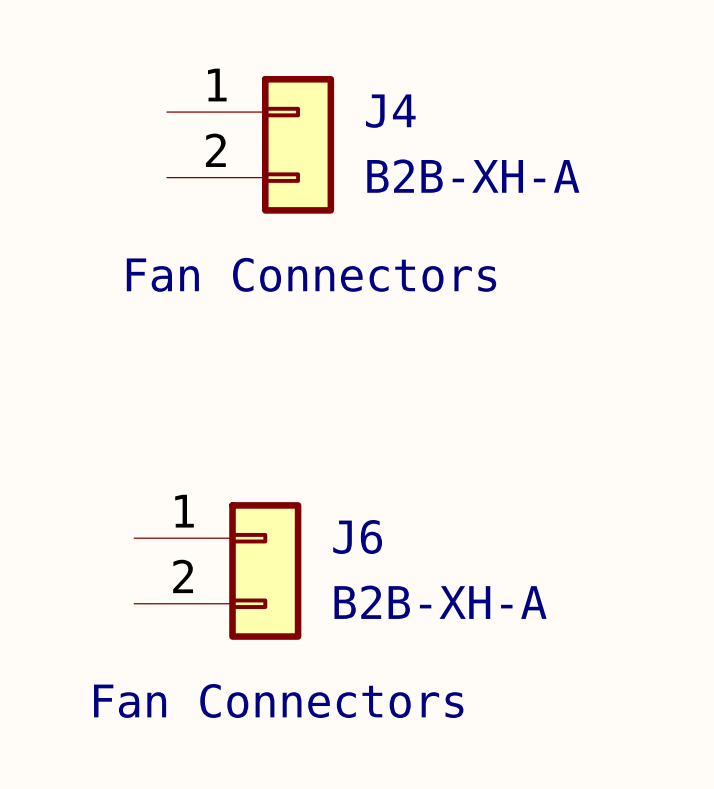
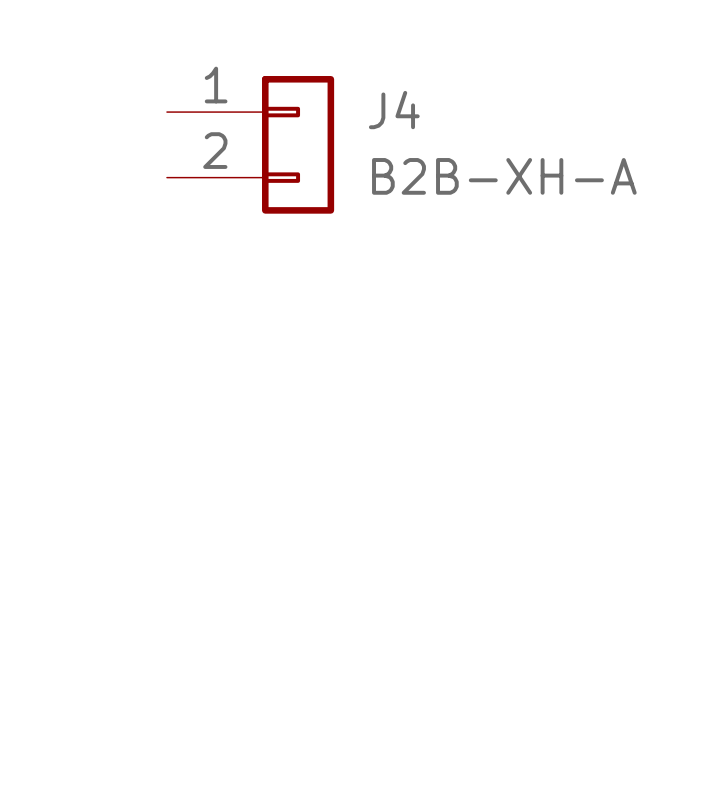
text: Fan Connectors (311, 274) -> none
J6: B2B-XH-A (217, 570) -> none
text: Fan Connectors (278, 700) -> none

